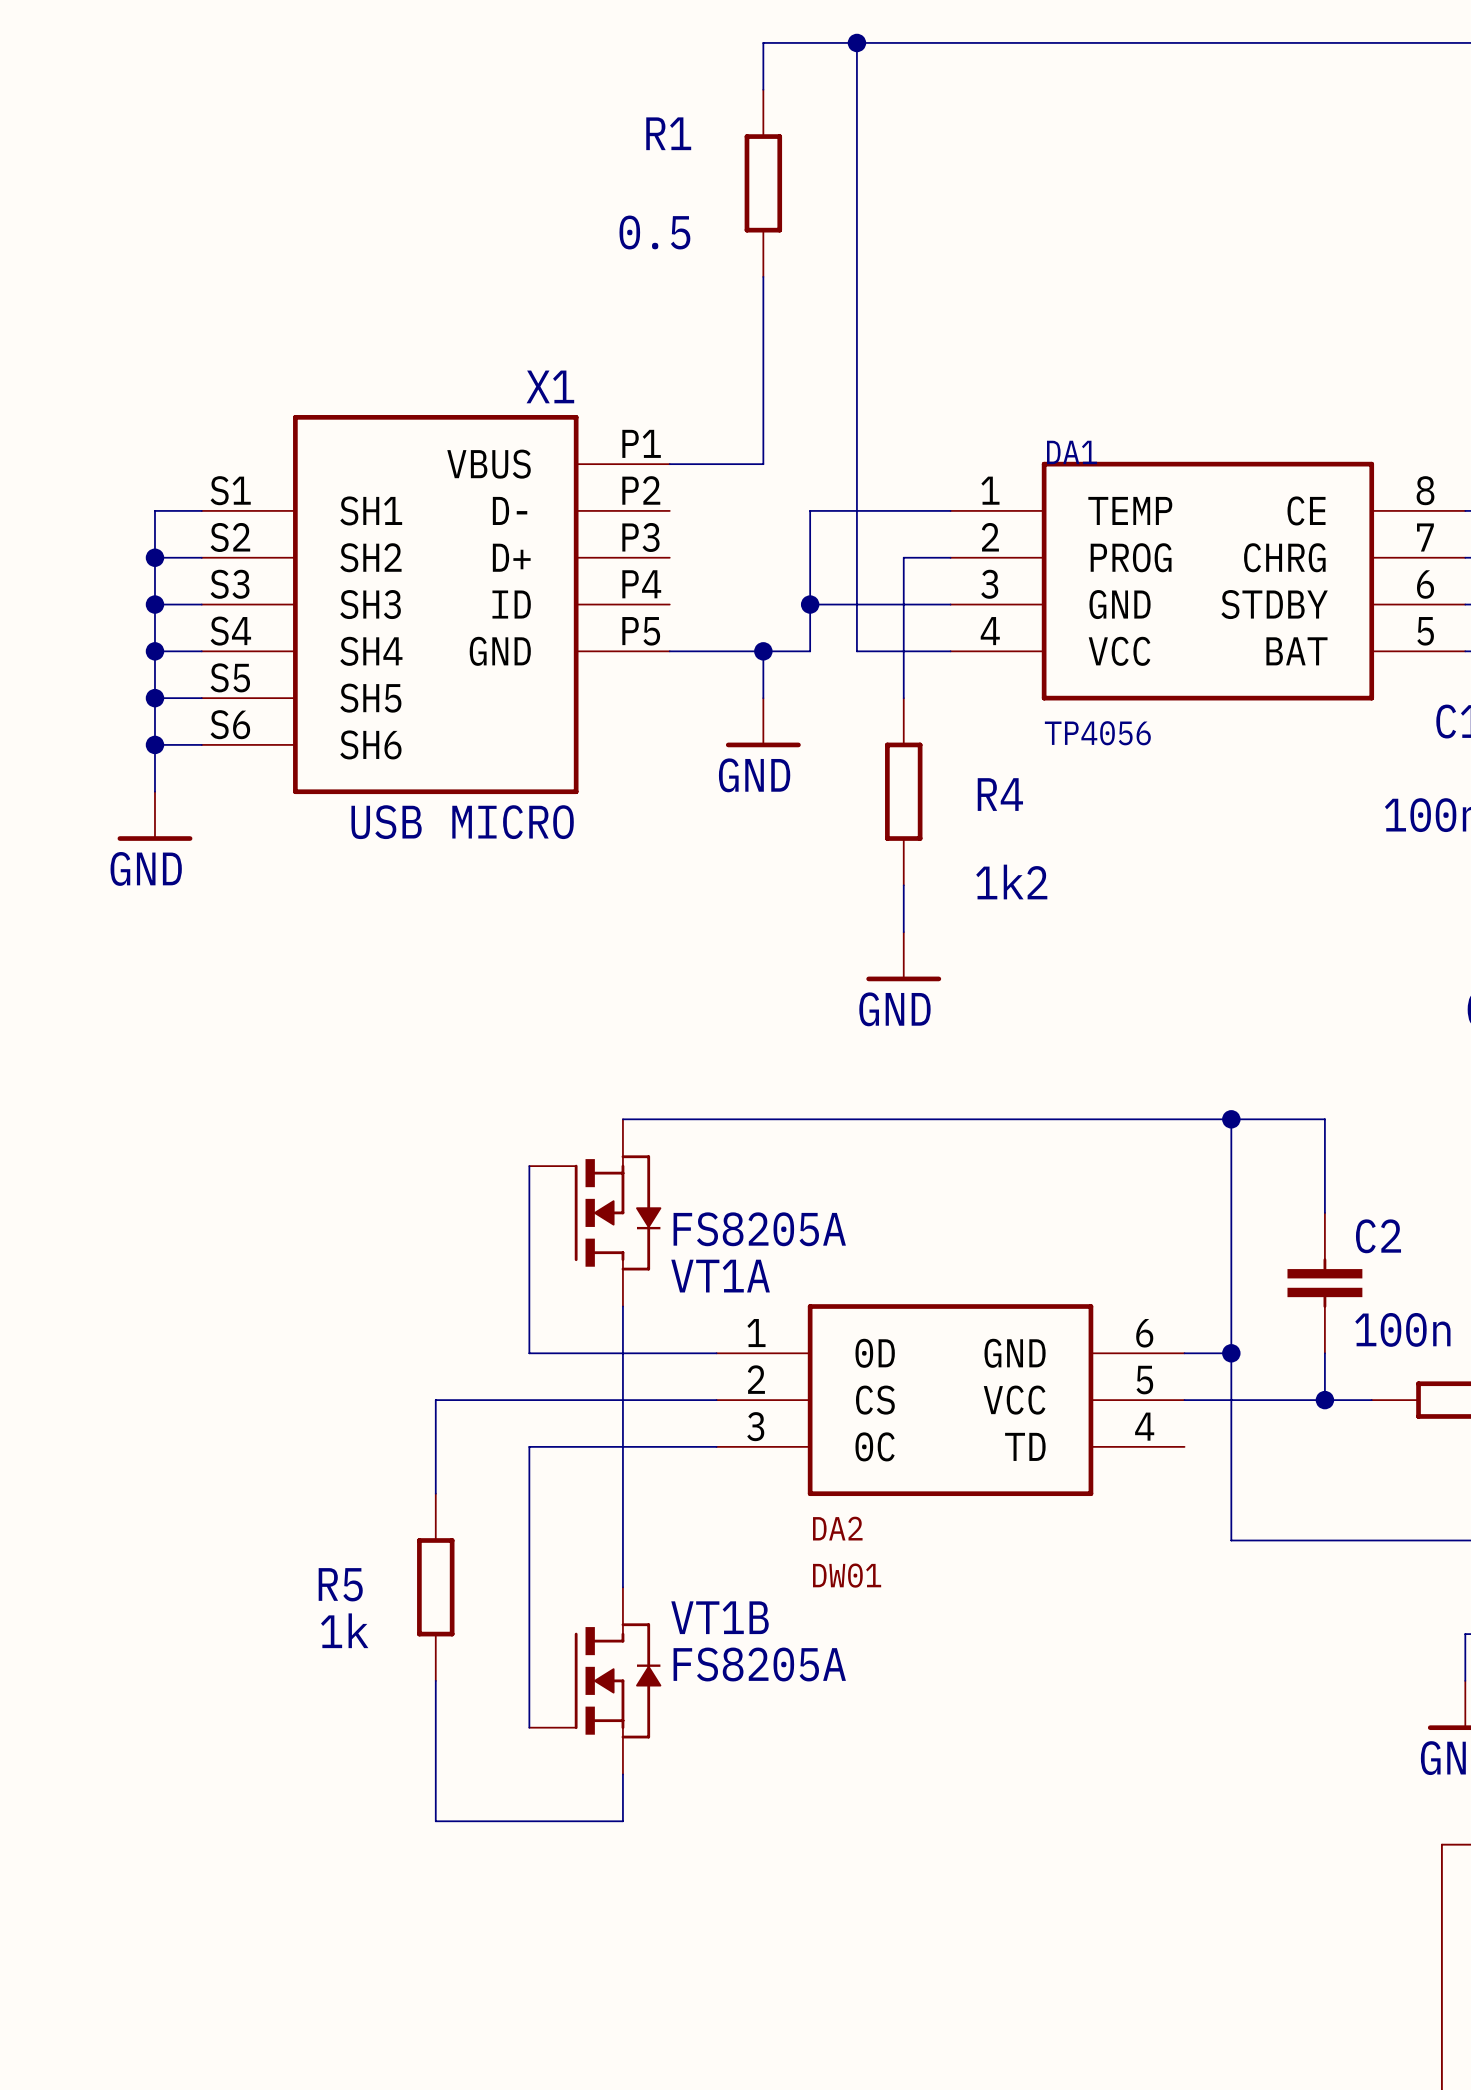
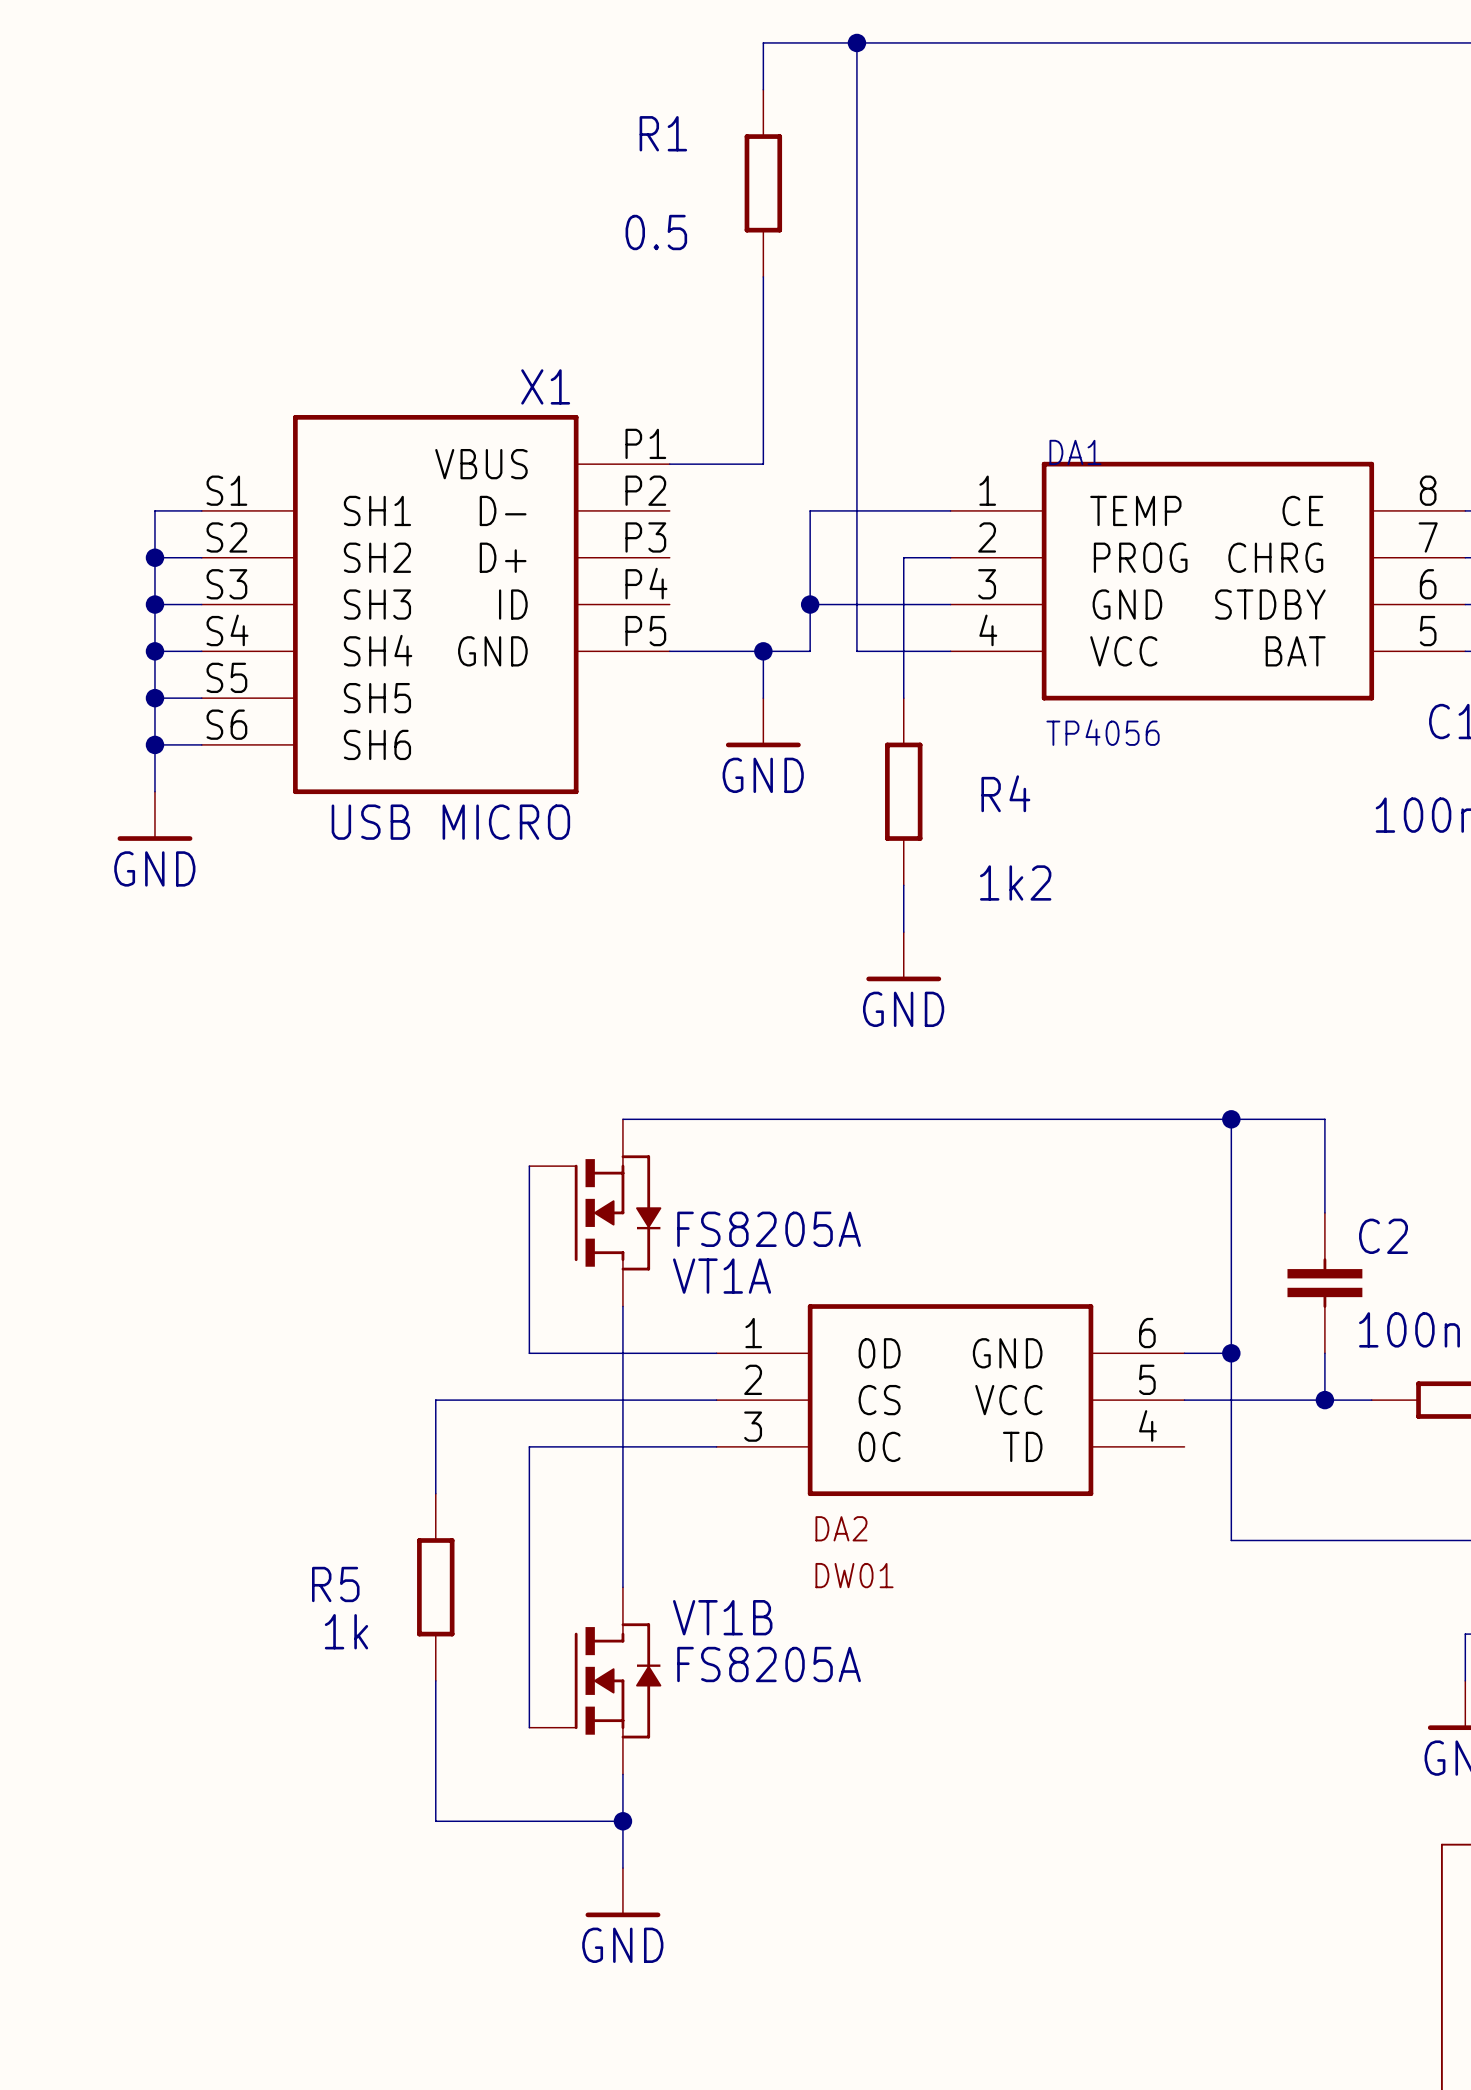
wire: none -> (622, 1821) (622, 1868)
junction: none -> (622, 1821)
power symbol: none -> GND (622, 1892)

